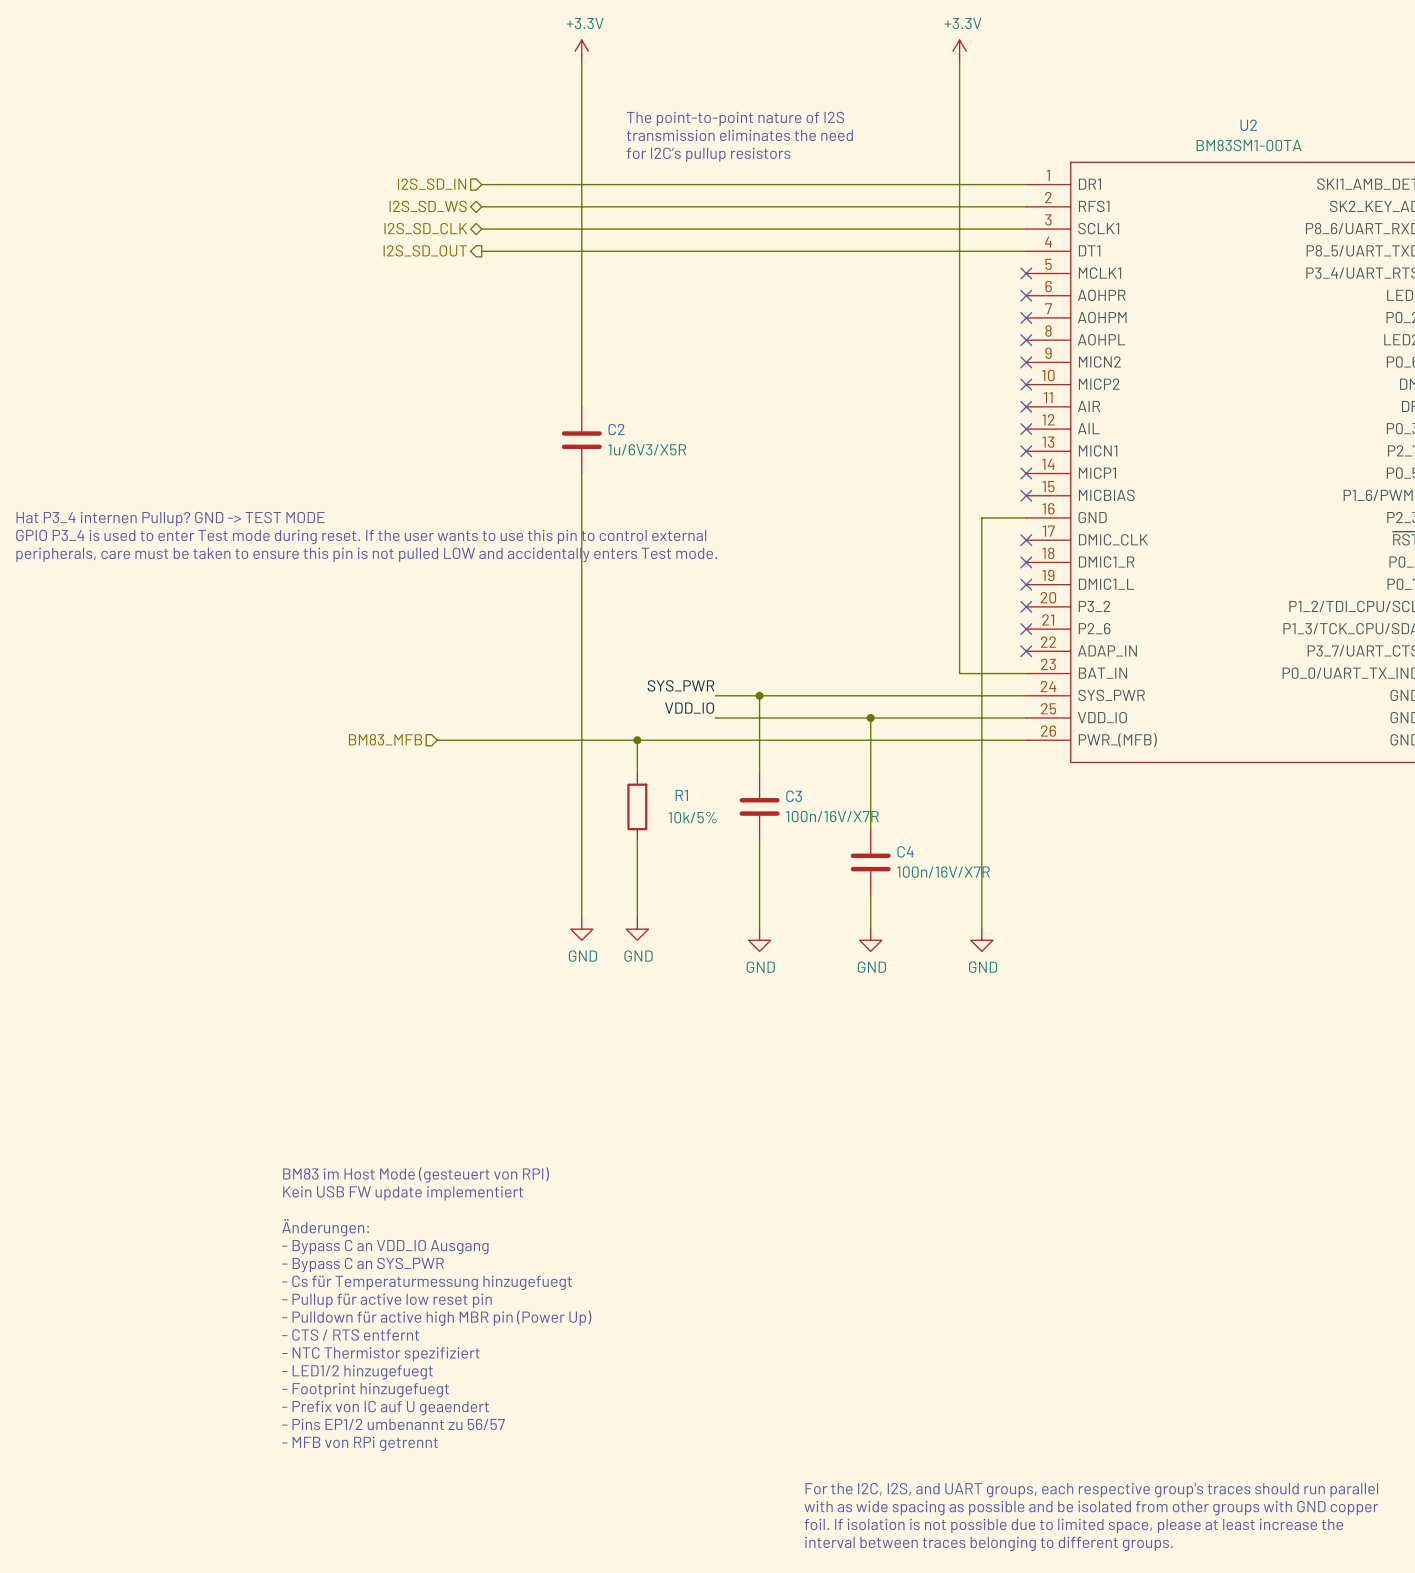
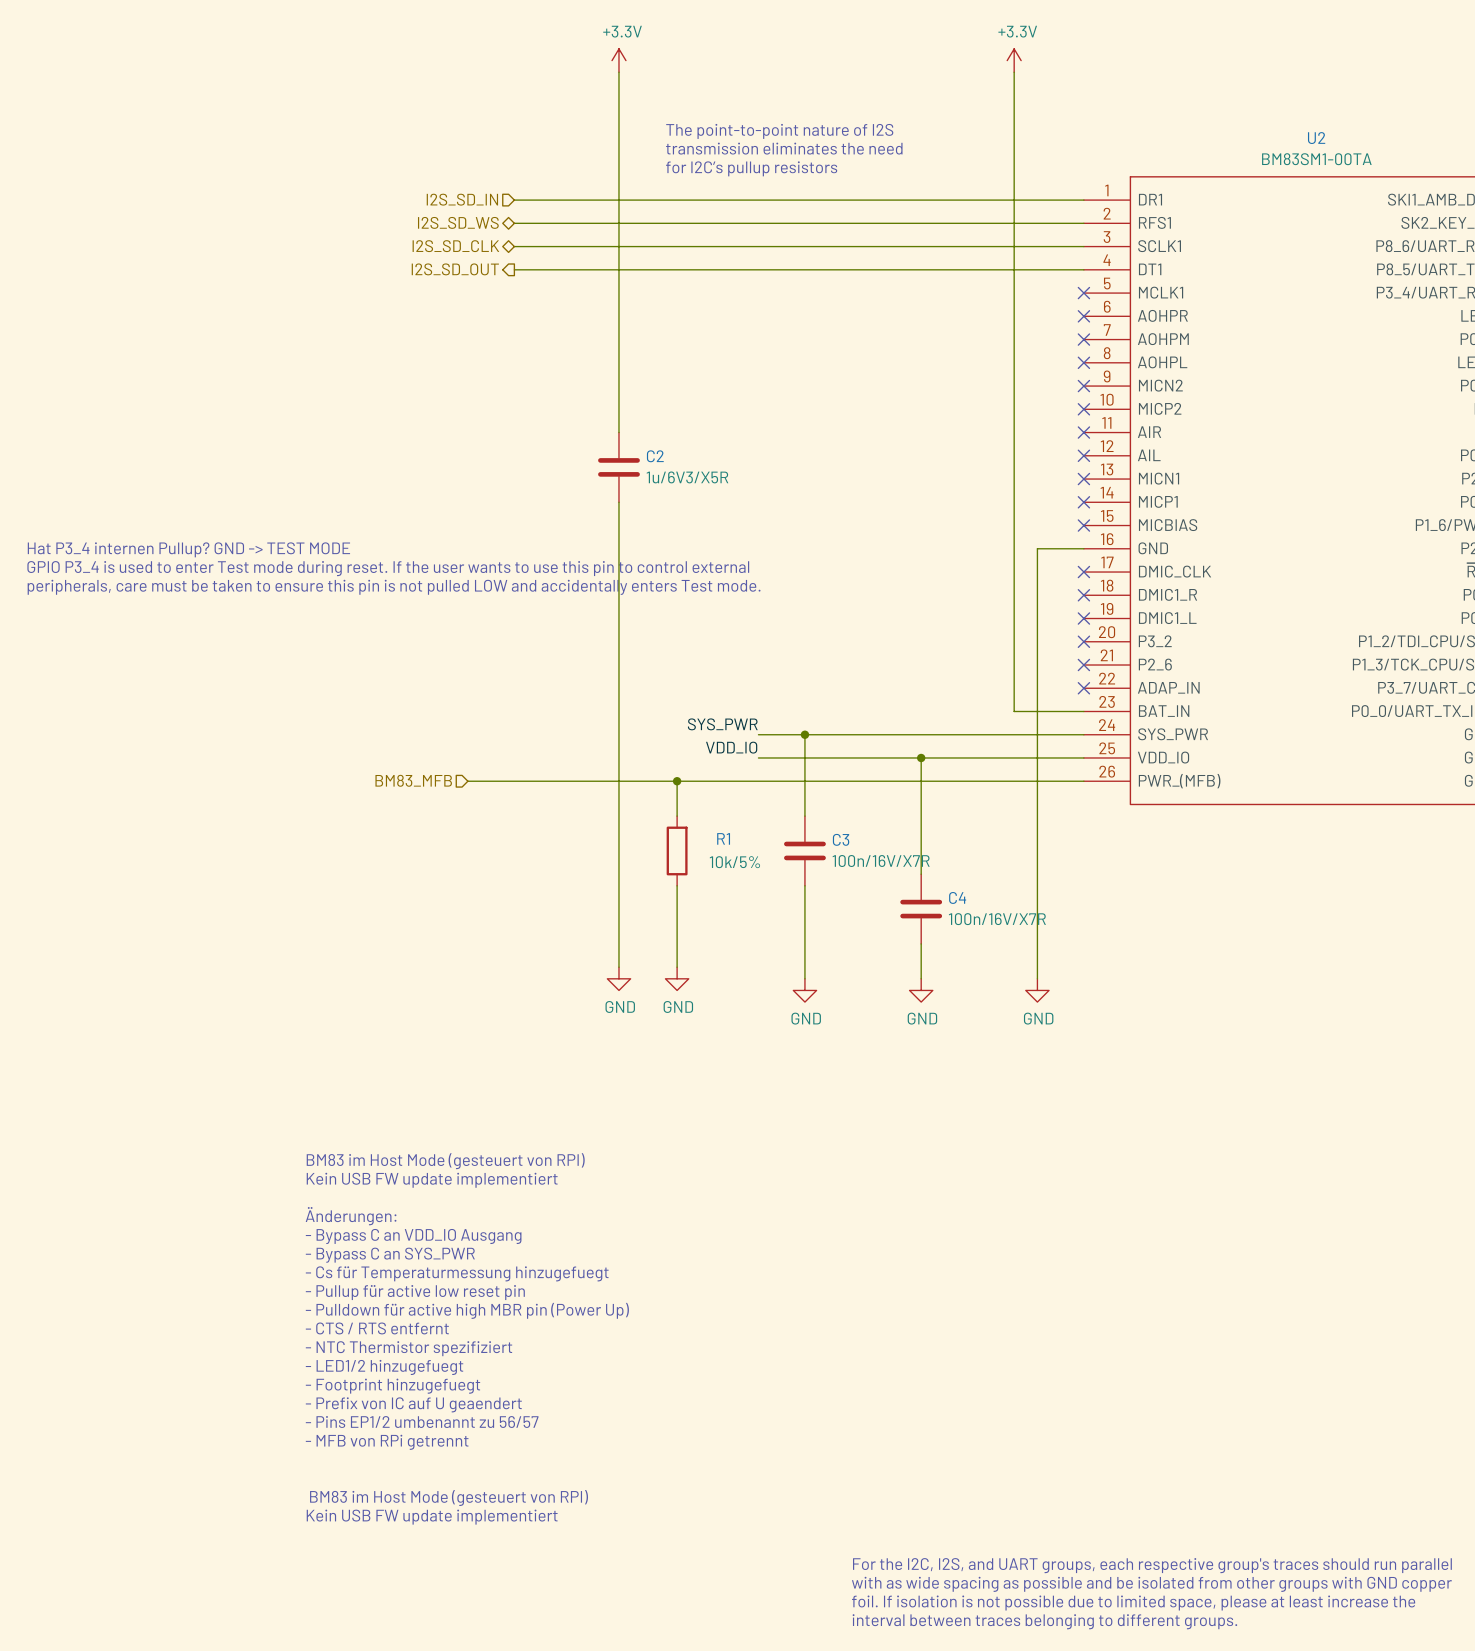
text: none -> BM83 im Host Mode (gesteuert von RPI) (445, 1161)
text: none -> Kein USB FW update implementiert (432, 1180)
text: none -> Änderungen: (351, 1216)
text: BM83 im Host Mode (gesteuert von RPI) (416, 1175) -> - Bypass C an VDD_IO Ausgang (413, 1236)
text: Kein USB FW update implementiert (403, 1193) -> - Bypass C an SYS_PWR (390, 1255)
text: none -> - Cs für Temperaturmessung hinzugefuegt (457, 1273)
text: Änderungen: (325, 1227) -> - Pullup für active low reset pin (415, 1292)
text: - Bypass C an VDD_IO Ausgang (385, 1247) -> - Pulldown für active high MBR pin (Power Up) (467, 1310)
text: - Bypass C an SYS_PWR (363, 1264) -> - CTS / RTS entfernt (377, 1328)
text: - Cs für Temperaturmessung hinzugefuegt (427, 1282) -> - NTC Thermistor spezifiziert (409, 1348)
text: - Pullup für active low reset pin (387, 1300) -> - LED1/2 hinzugefuegt (384, 1367)
text: - Pulldown für active high MBR pin (Power Up) (436, 1318) -> - Footprint hinzugefuegt (392, 1386)
text: - CTS / RTS entfernt (350, 1335) -> - Prefix von IC auf U geaendert (413, 1404)
text: - NTC Thermistor spezifiziert (381, 1354) -> - Pins EP1/2 umbenannt zu 56/57 (422, 1422)
text: - LED1/2 hinzugefuegt (357, 1372) -> - MFB von RPi getrennt (387, 1442)
text: - Footprint hinzugefuegt (365, 1390) -> none
text: - Prefix von IC auf U geaendert (385, 1408) -> none
text: - Pins EP1/2 umbenannt zu 56/57 (393, 1424) -> BM83 im Host Mode (gesteuert von RPI) (449, 1498)
text: - MFB von RPi getrennt (360, 1443) -> Kein USB FW update implementiert (432, 1517)

